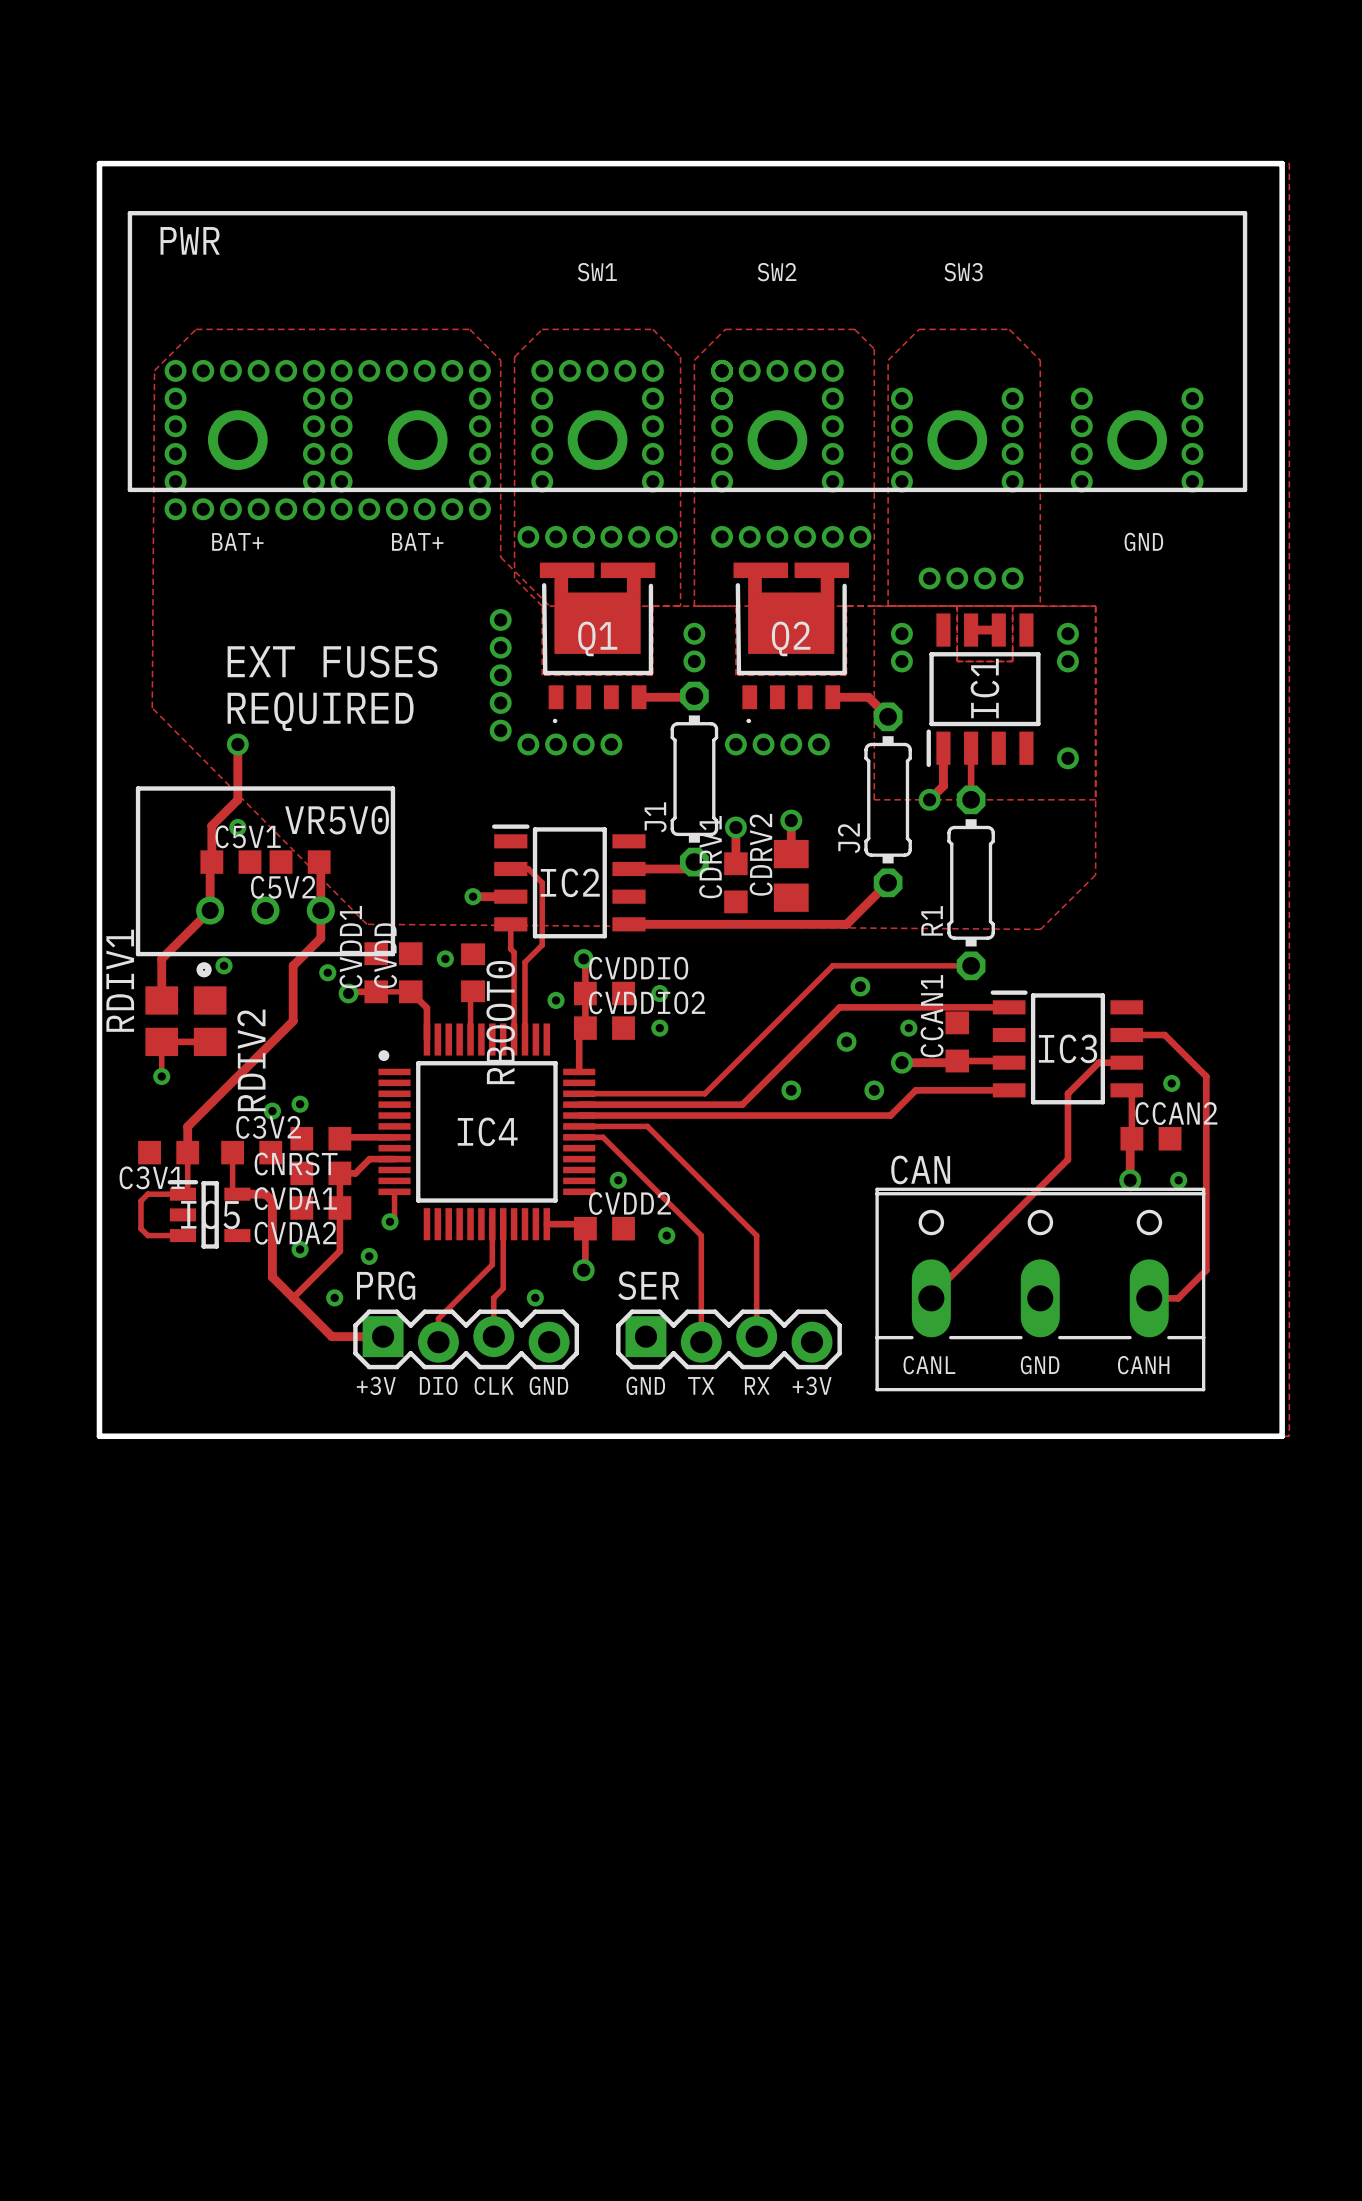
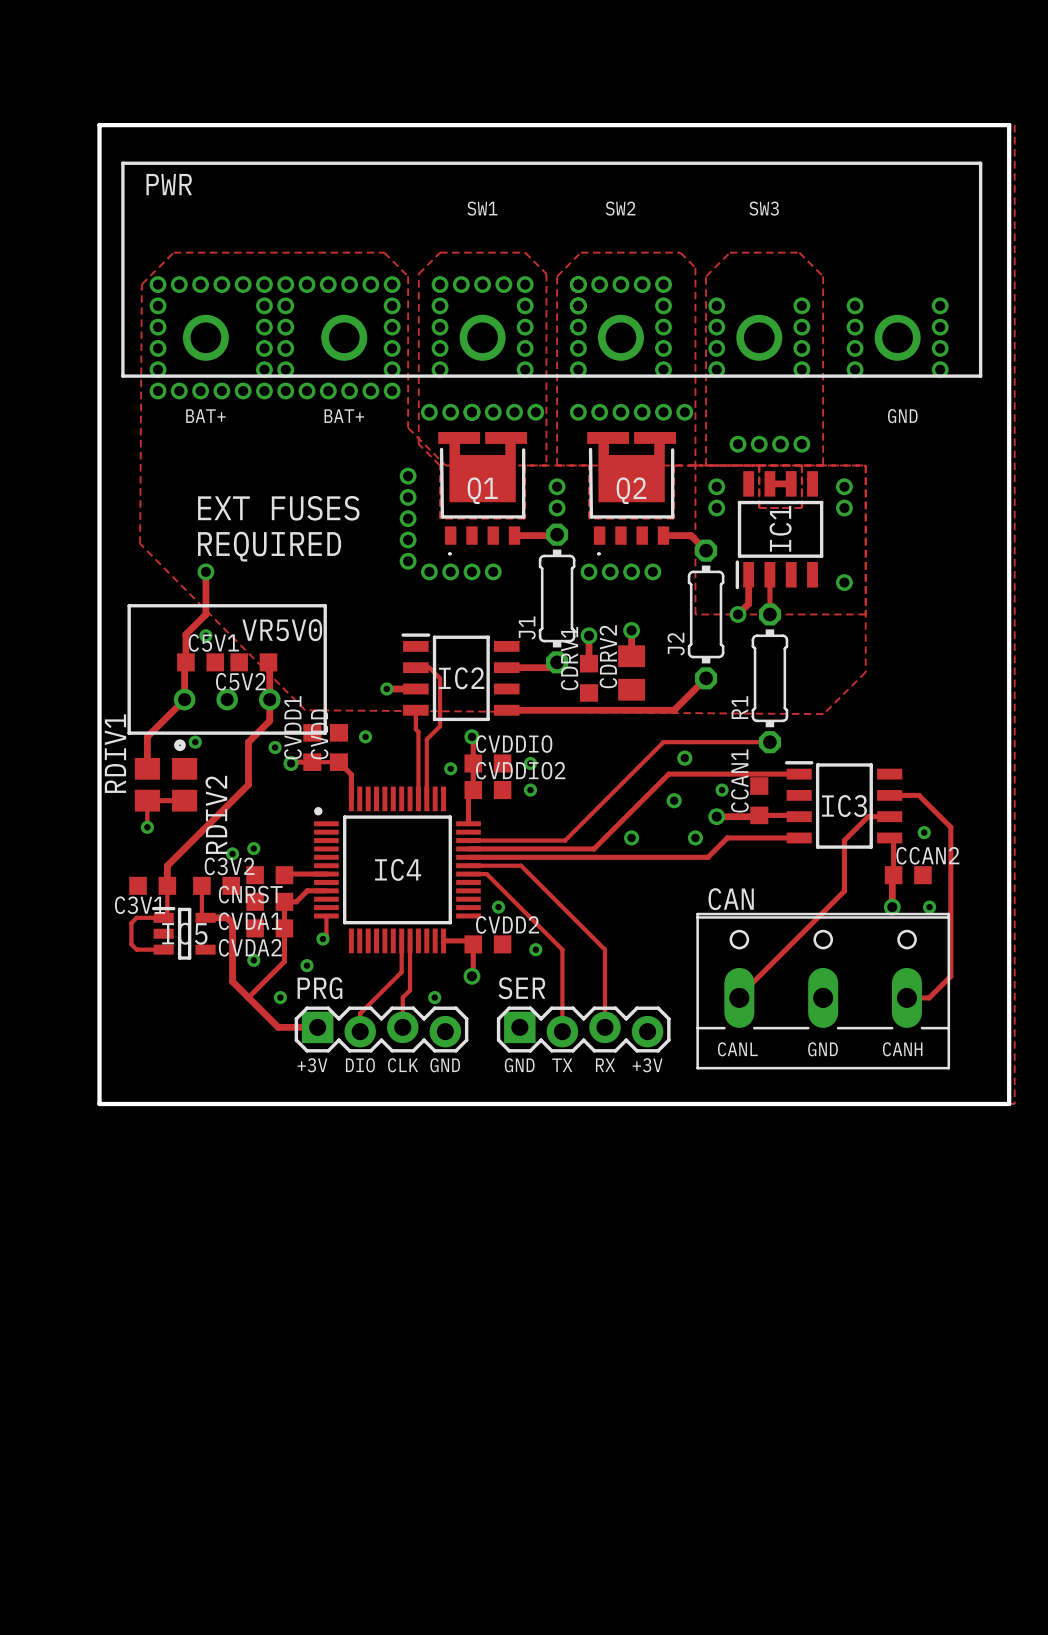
RBOOT0: (473, 972) -> none
track: (473, 991) (470, 993) (470, 1039) -> none

